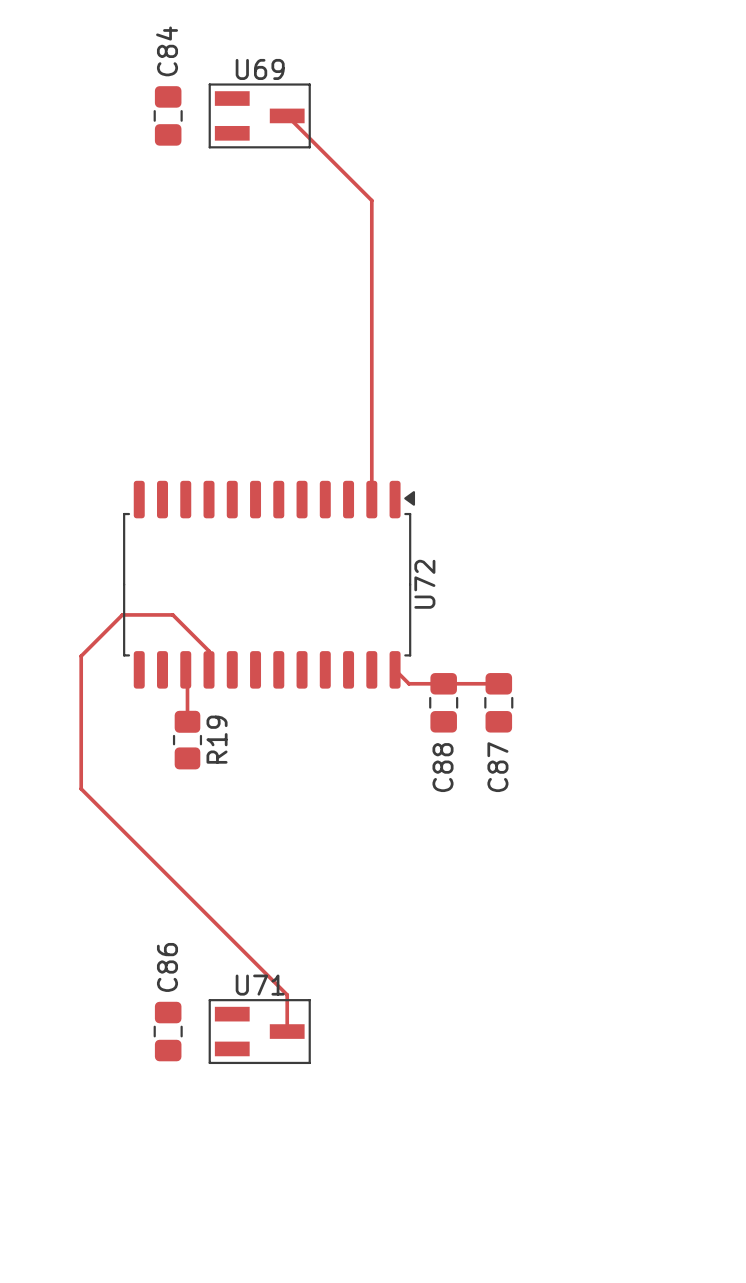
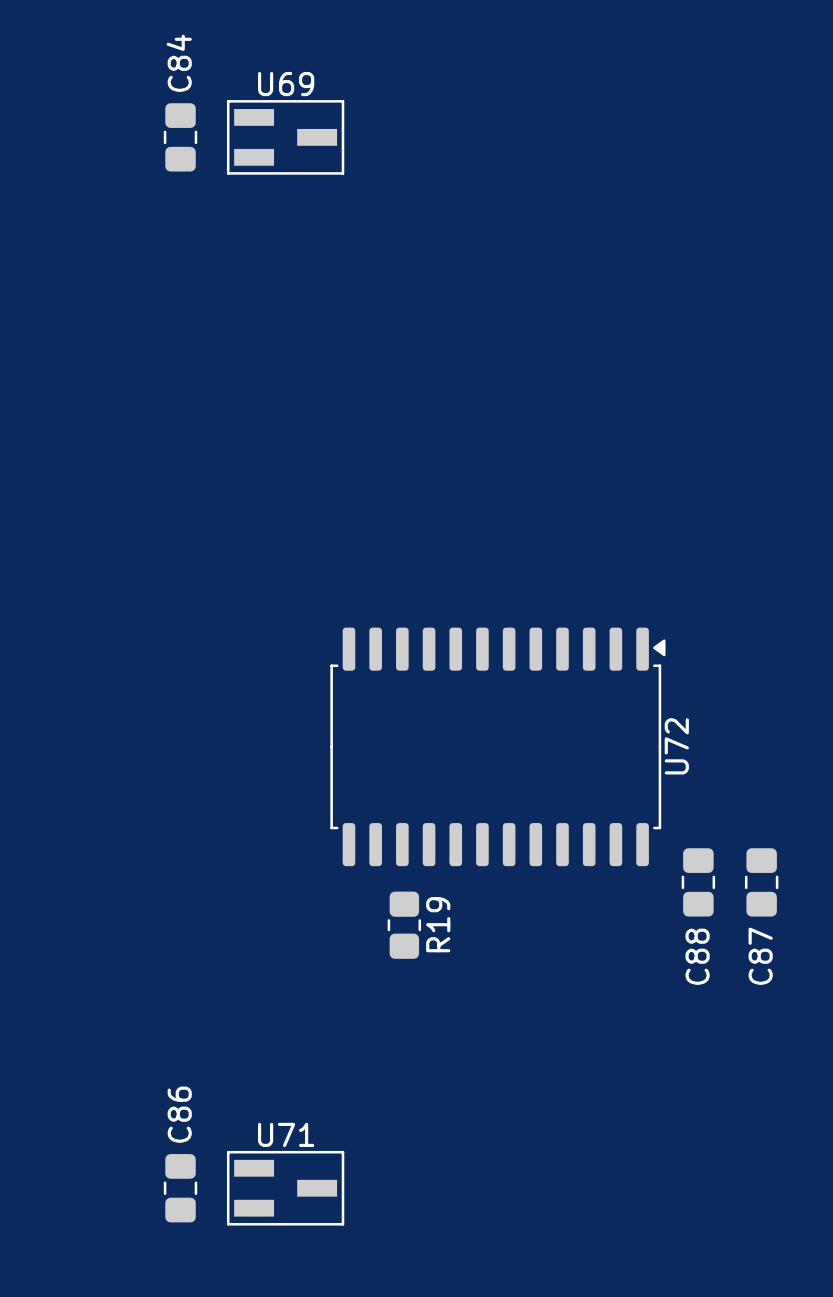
track: (287, 115) (371, 200) (371, 499) -> none
U72 position: (269, 584) -> (497, 746)
track: (185, 669) (187, 671) (187, 721) -> none
track: (209, 669) (209, 651) (172, 614) (122, 614) (81, 656) (81, 788) (287, 994) (287, 1031) -> none
track: (395, 669) (408, 683) (498, 683) -> none
C88 position: (443, 702) -> (698, 882)
C87 position: (498, 702) -> (761, 882)
R19 position: (187, 740) -> (404, 925)

